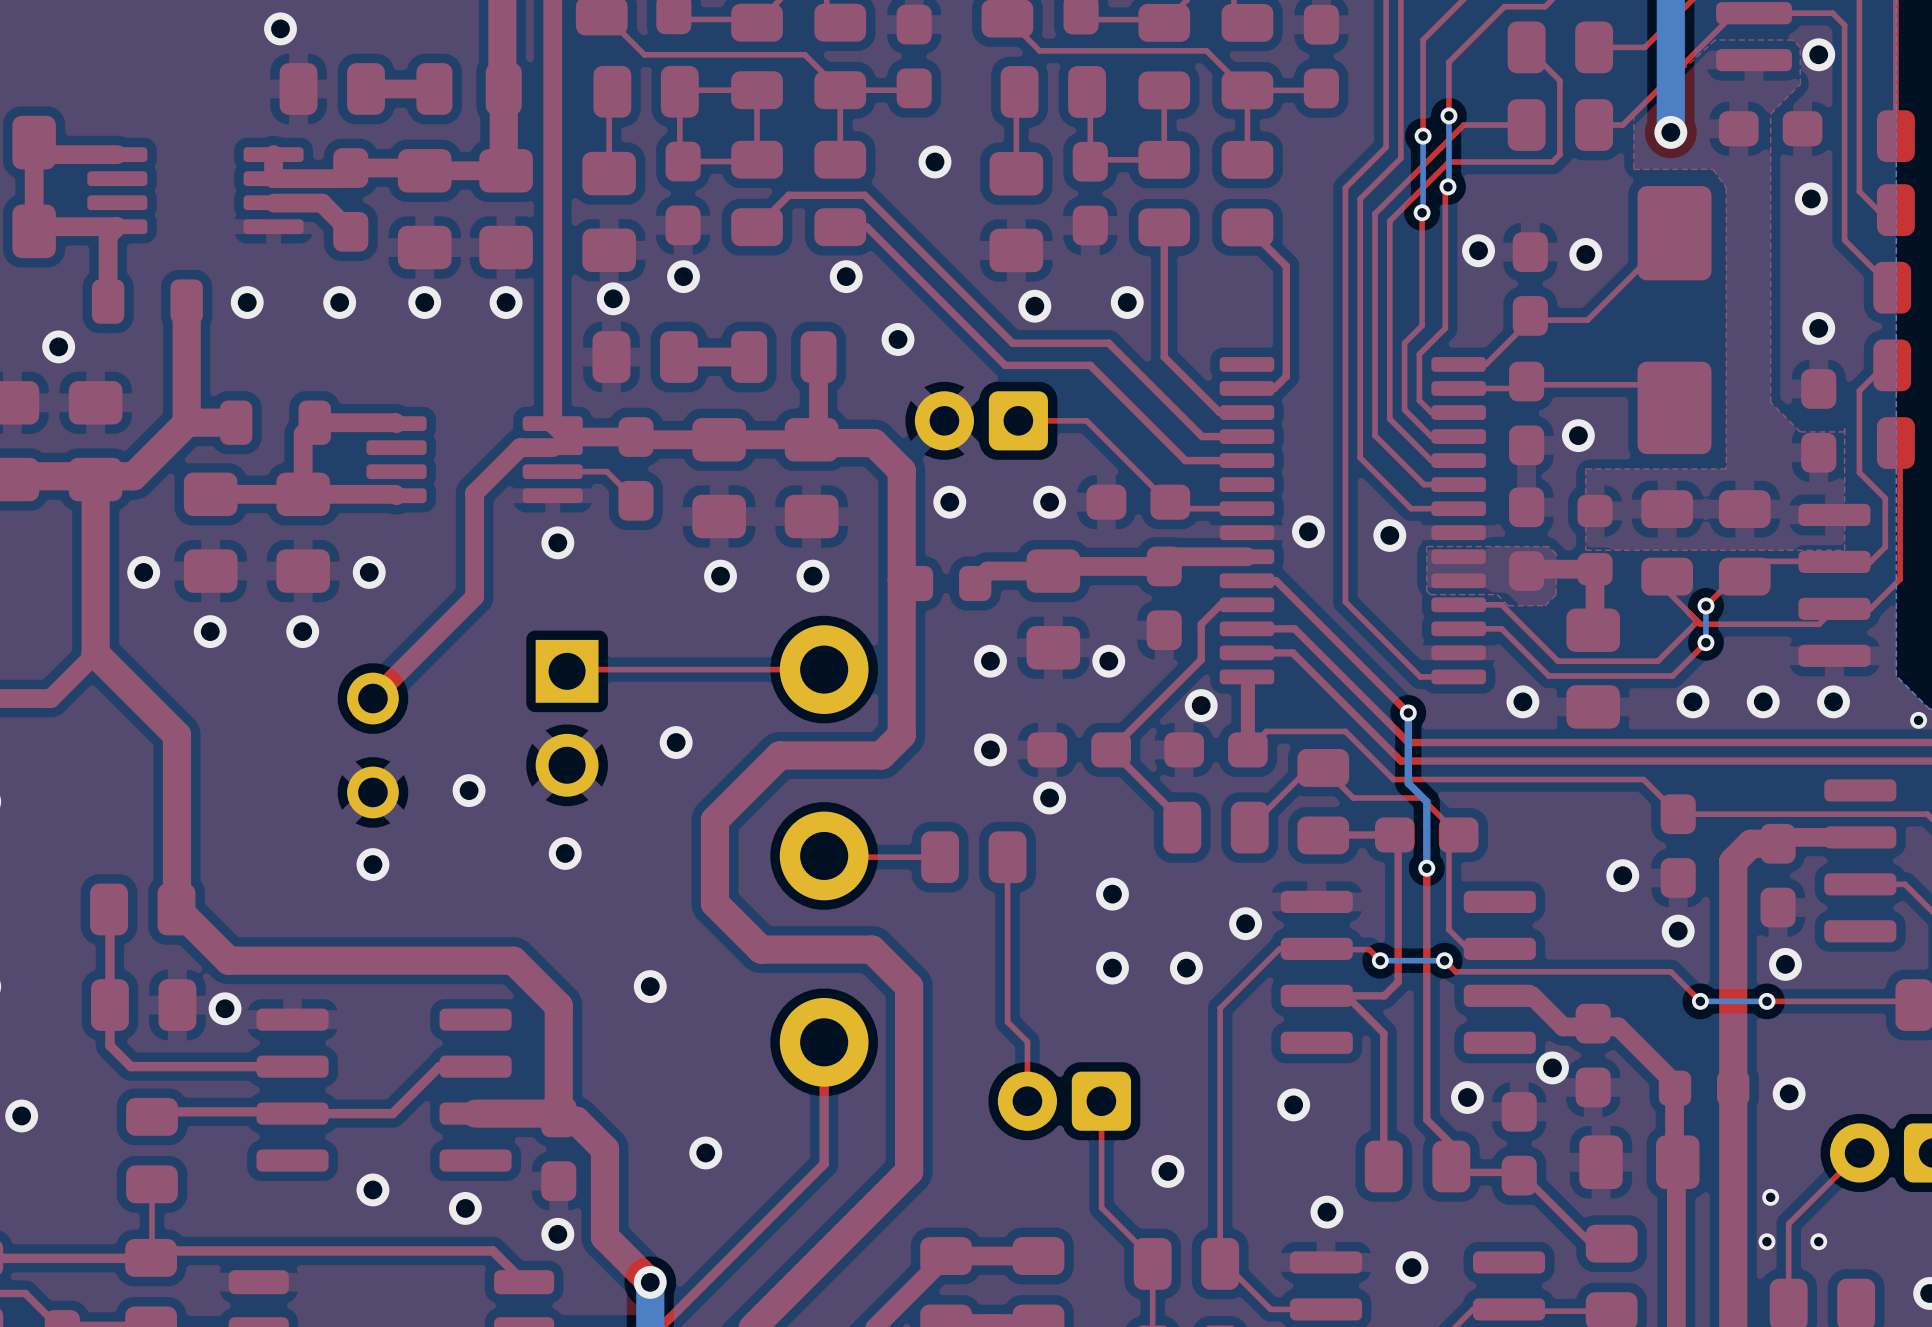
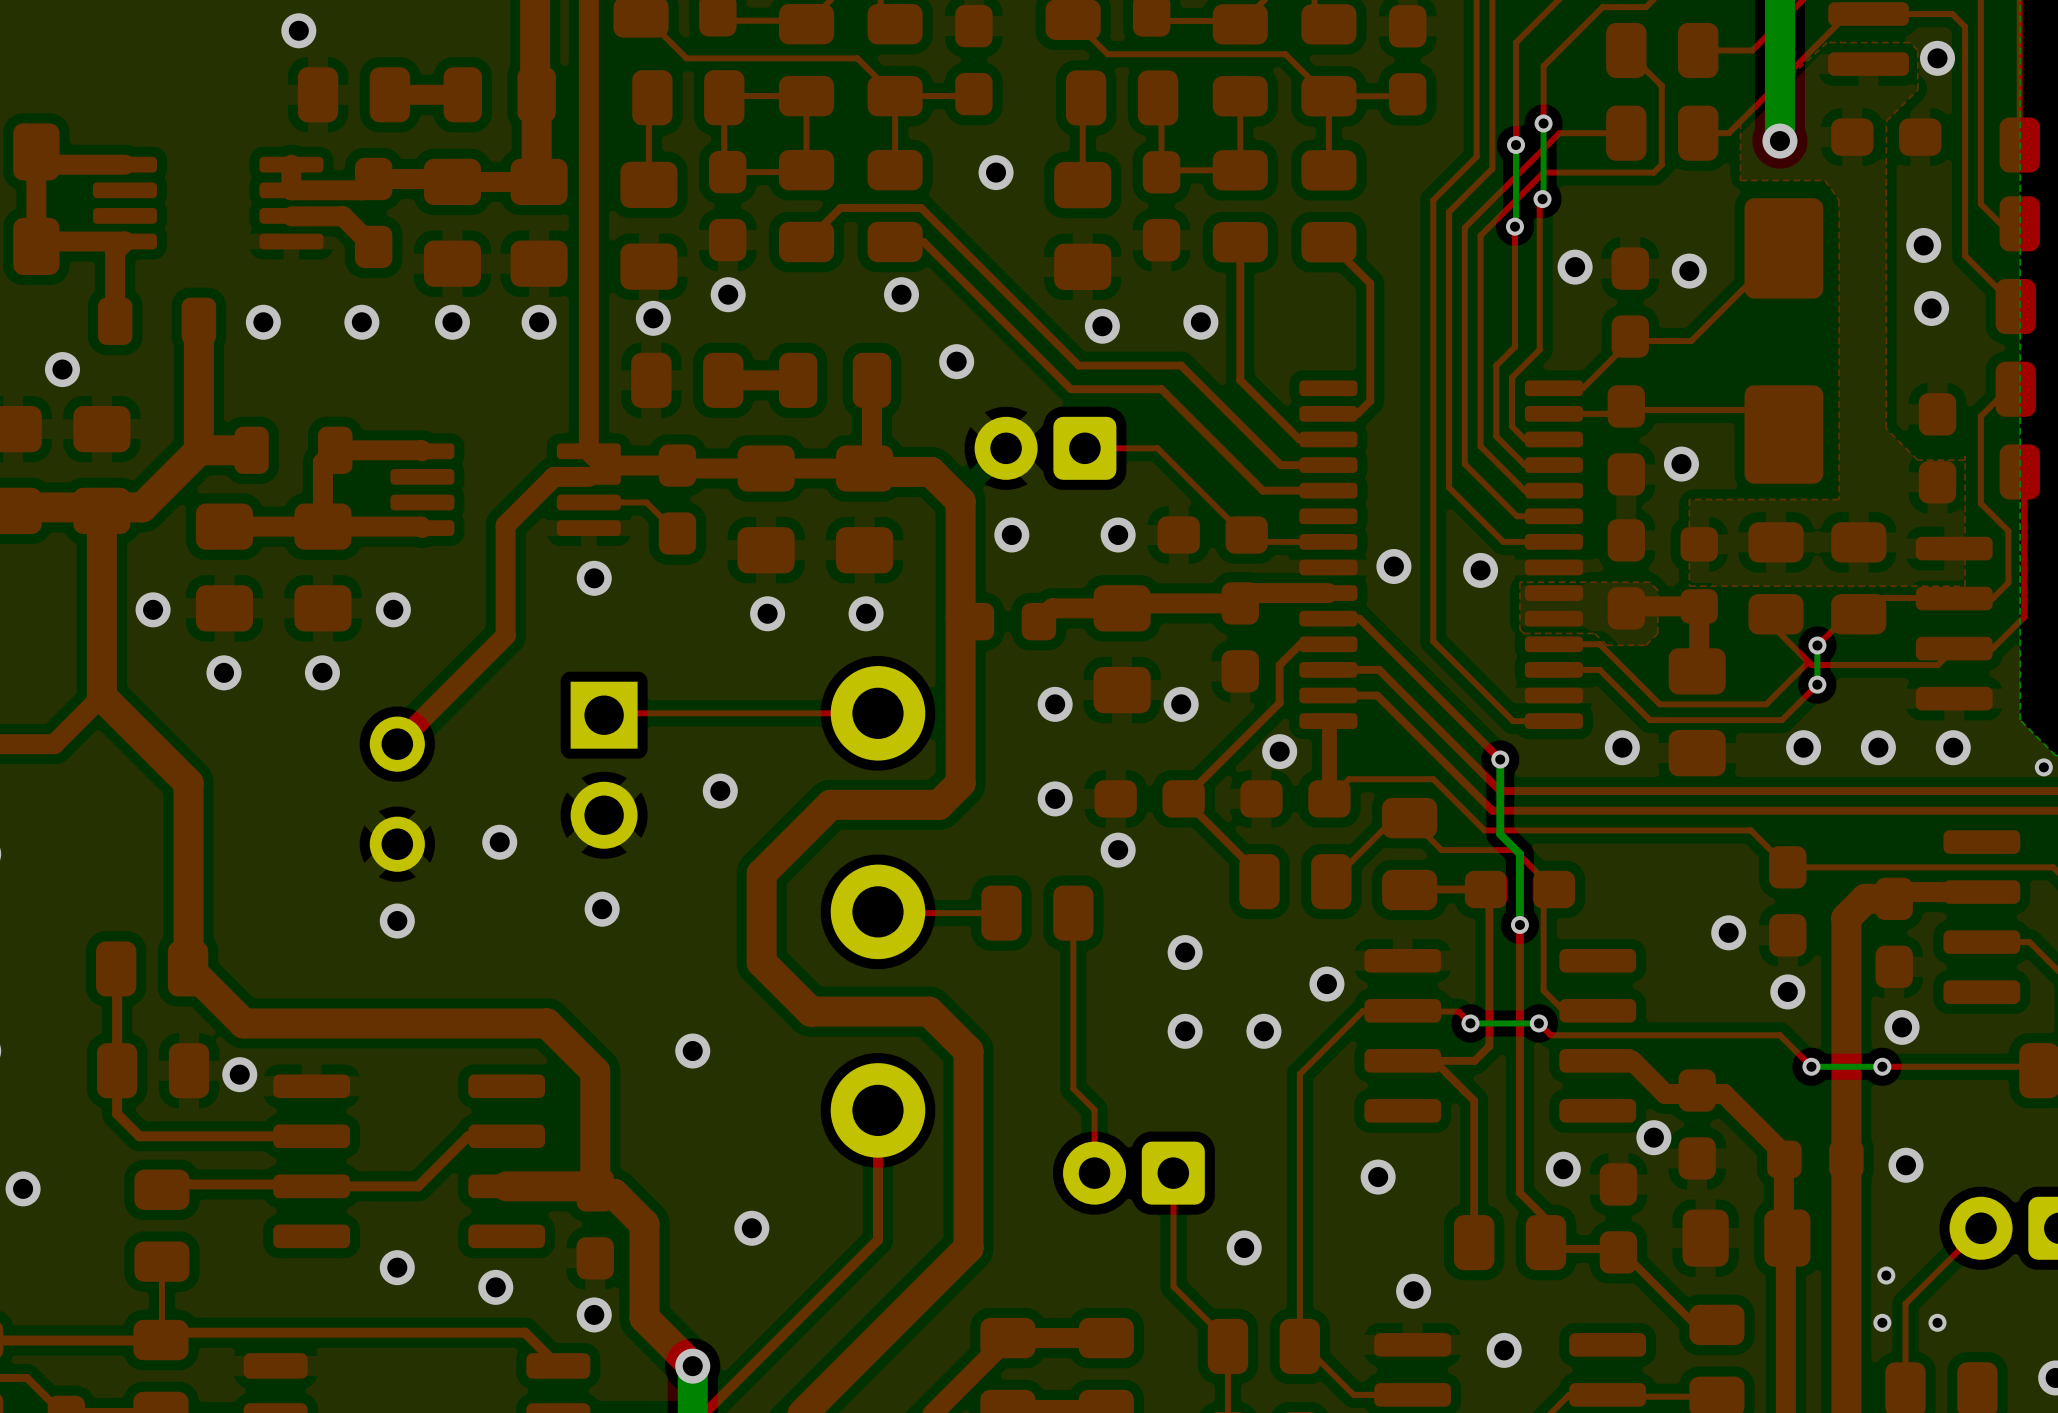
via position: (1811, 198) -> (1923, 245)
via position: (1818, 328) -> (1931, 308)

